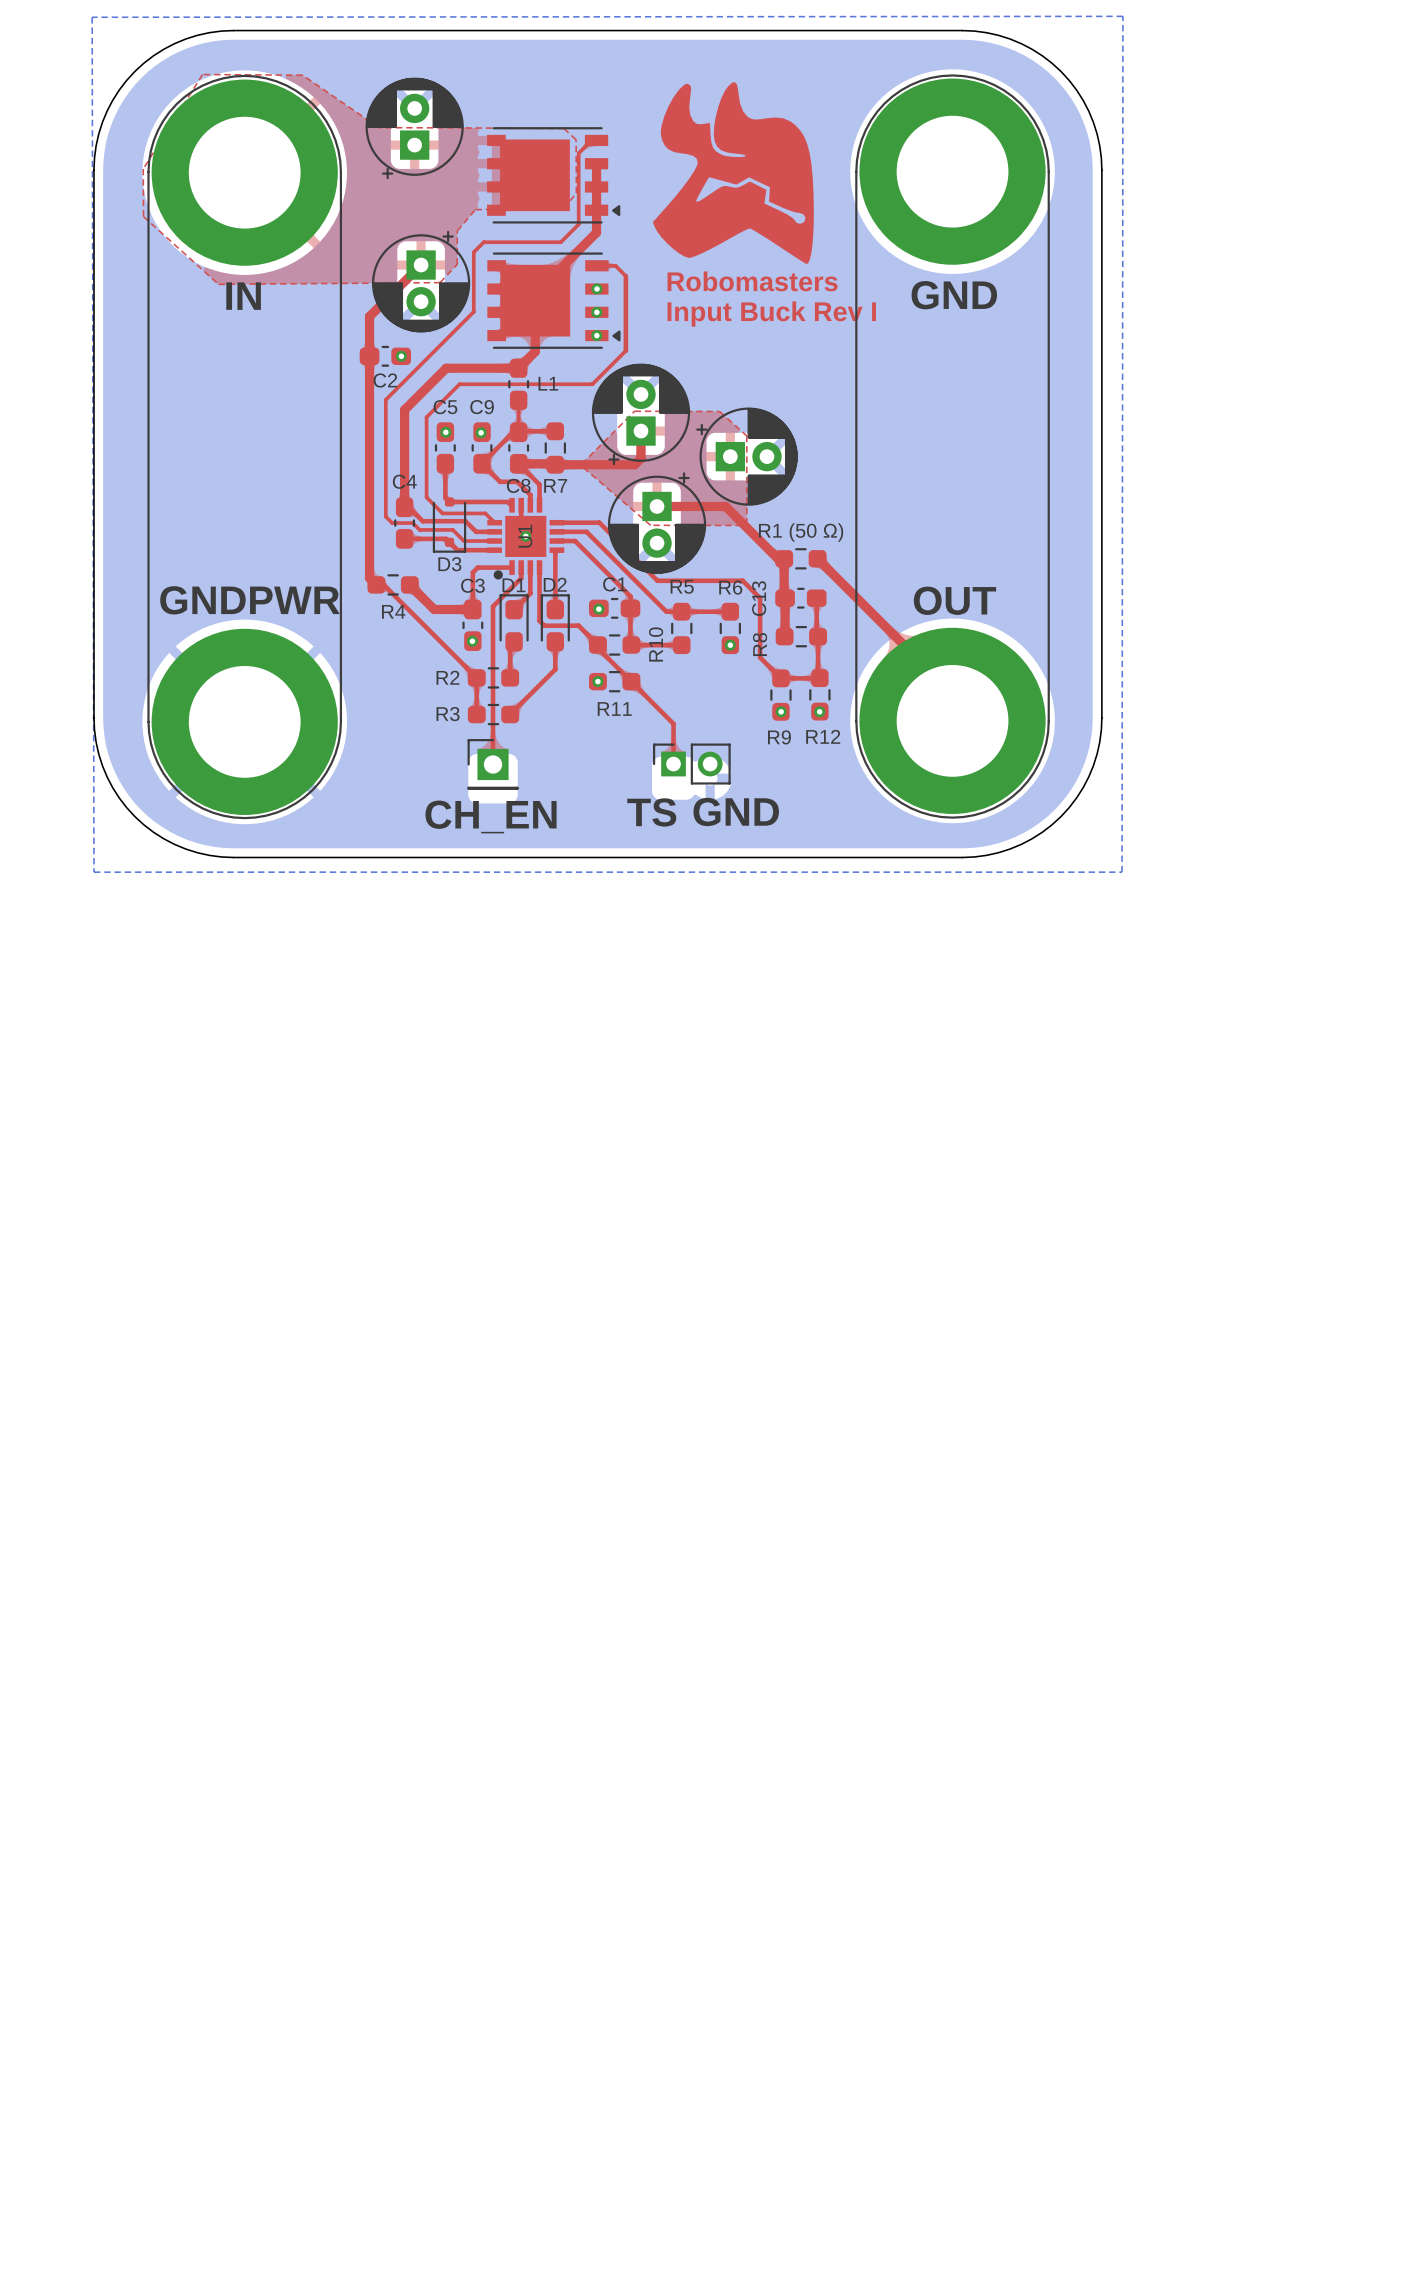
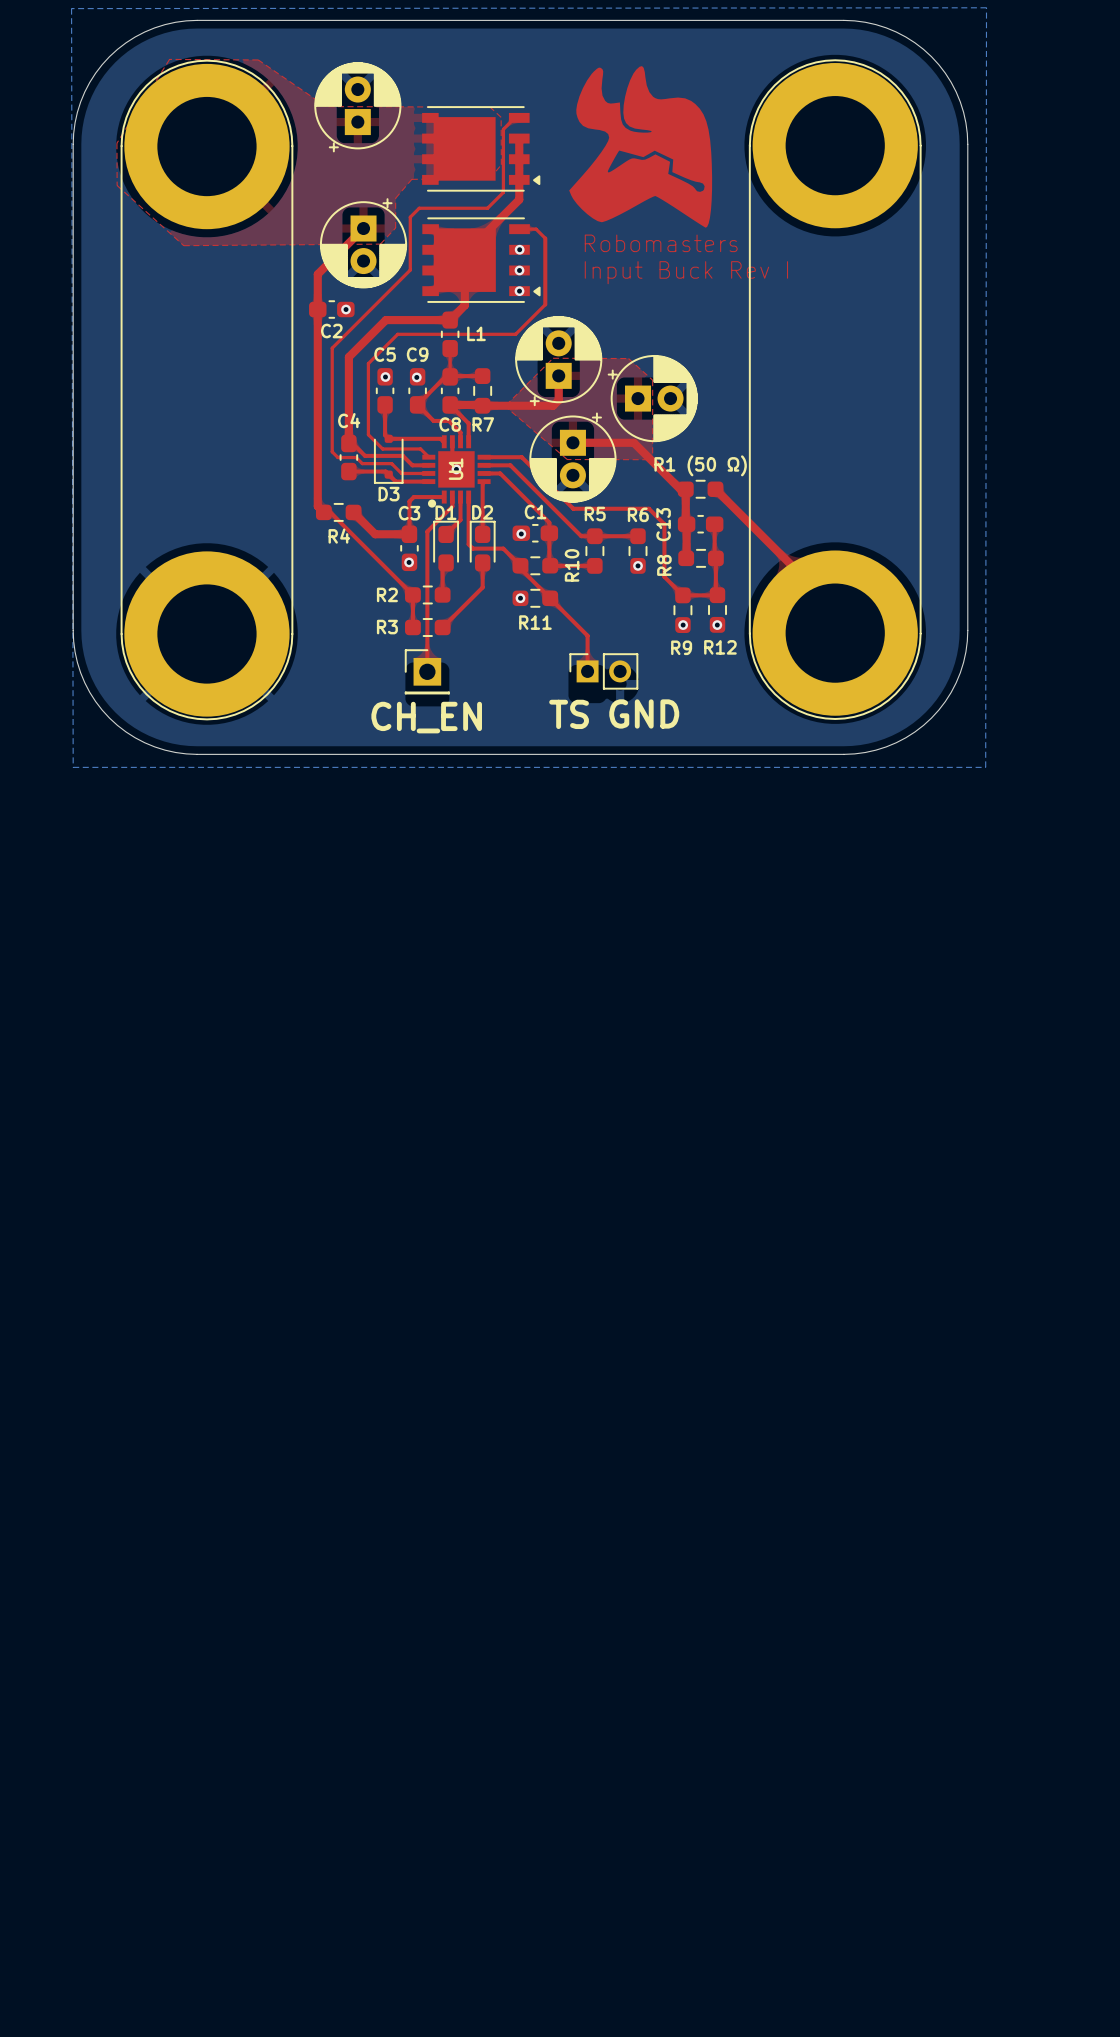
text: GND (954, 295) -> none
text: IN (243, 296) -> none
text: GNDPWR (249, 600) -> none
text: OUT (954, 600) -> none

